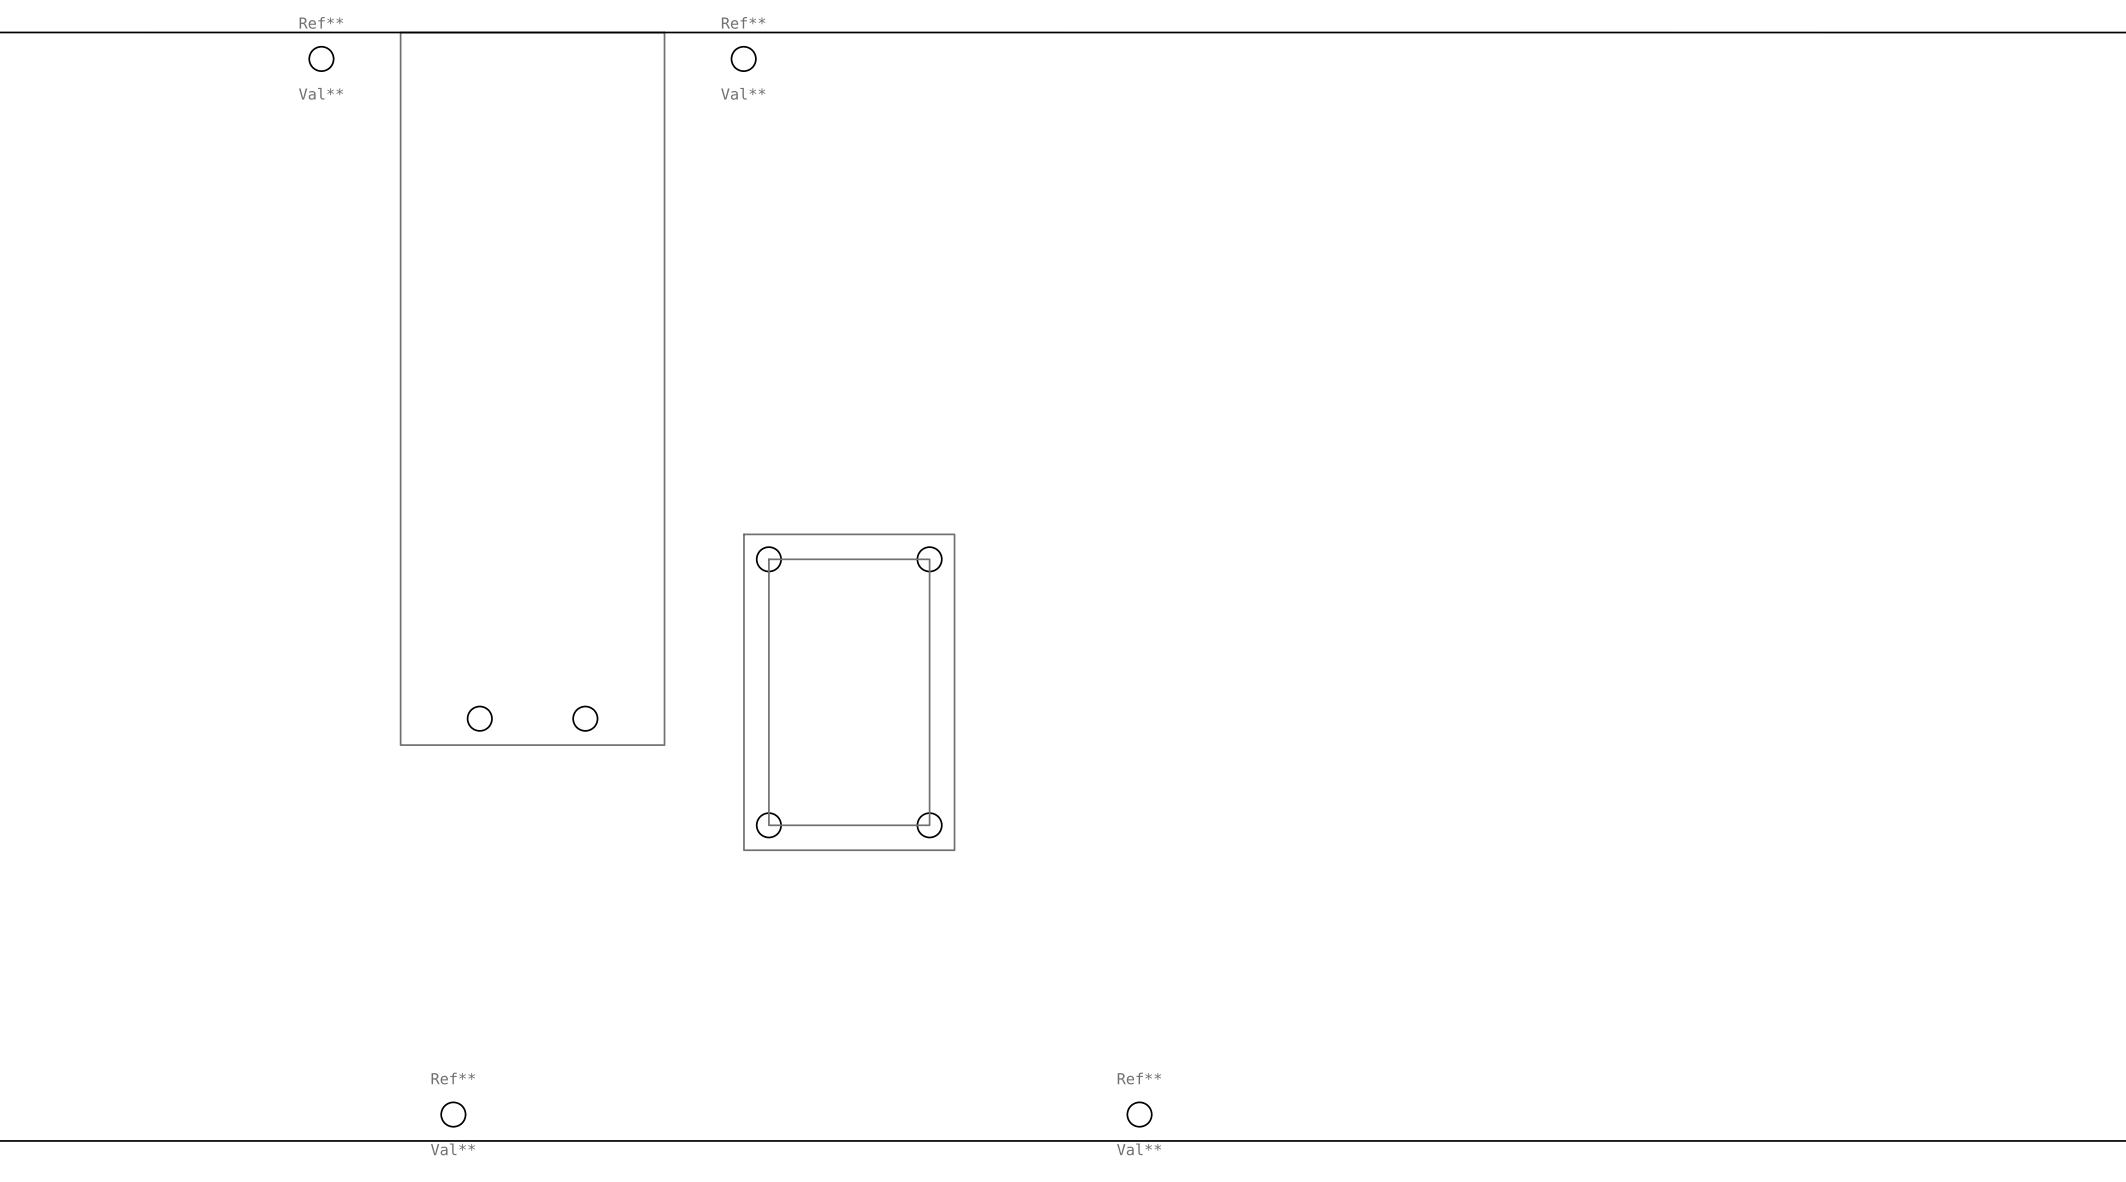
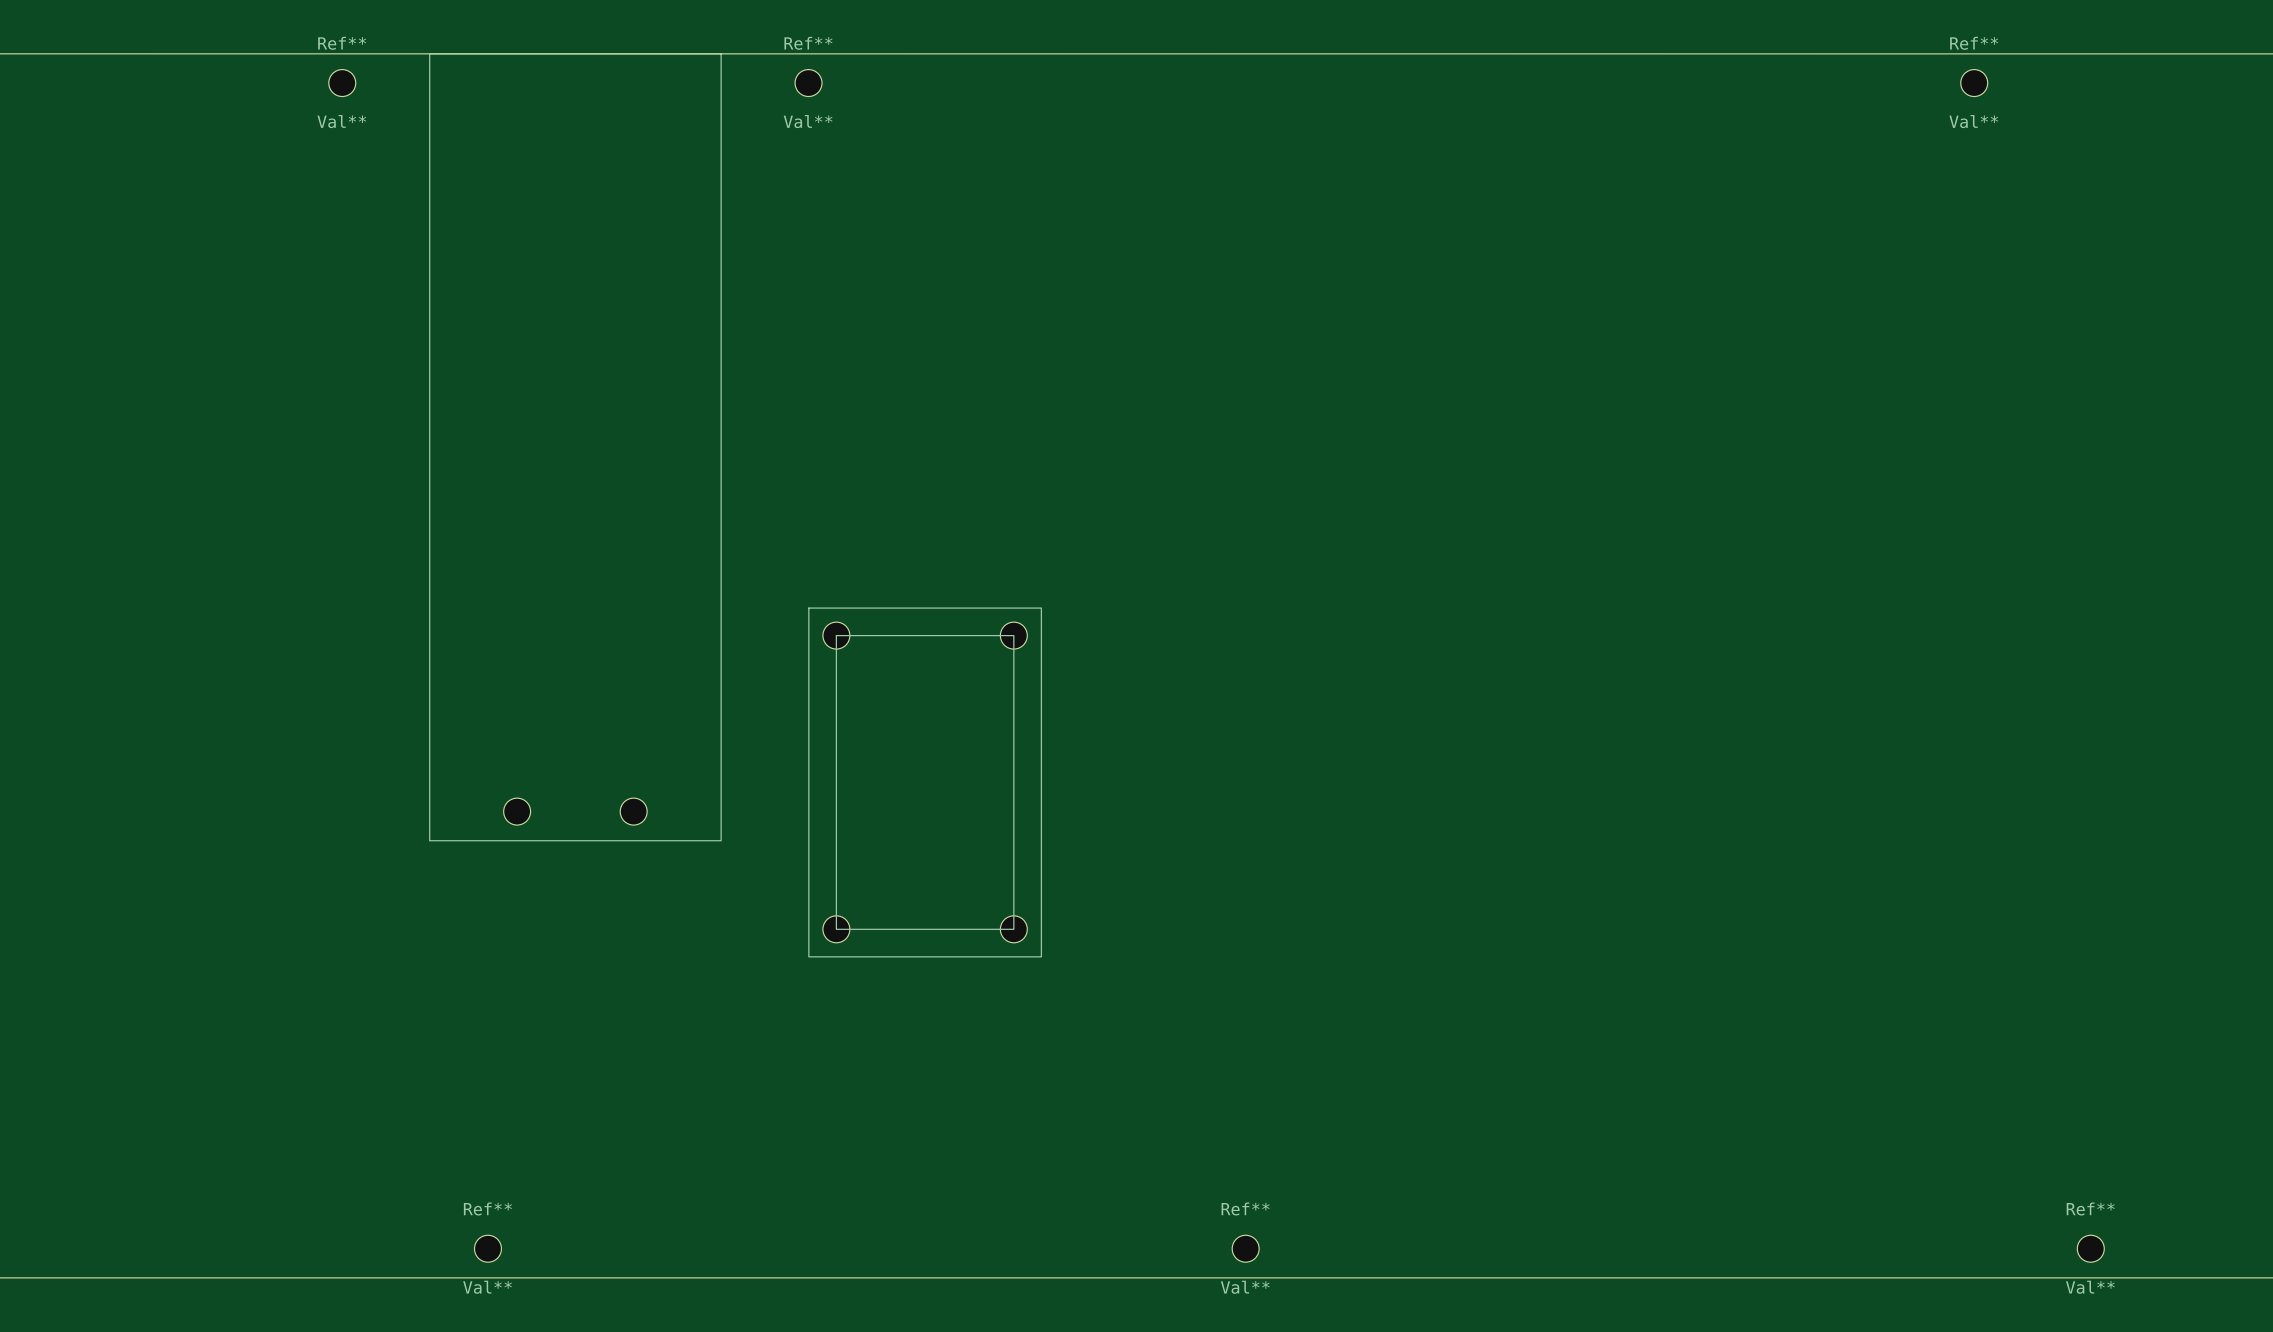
Ref**: none -> Val** (1974, 83)
Ref**: none -> Val** (2090, 1248)

